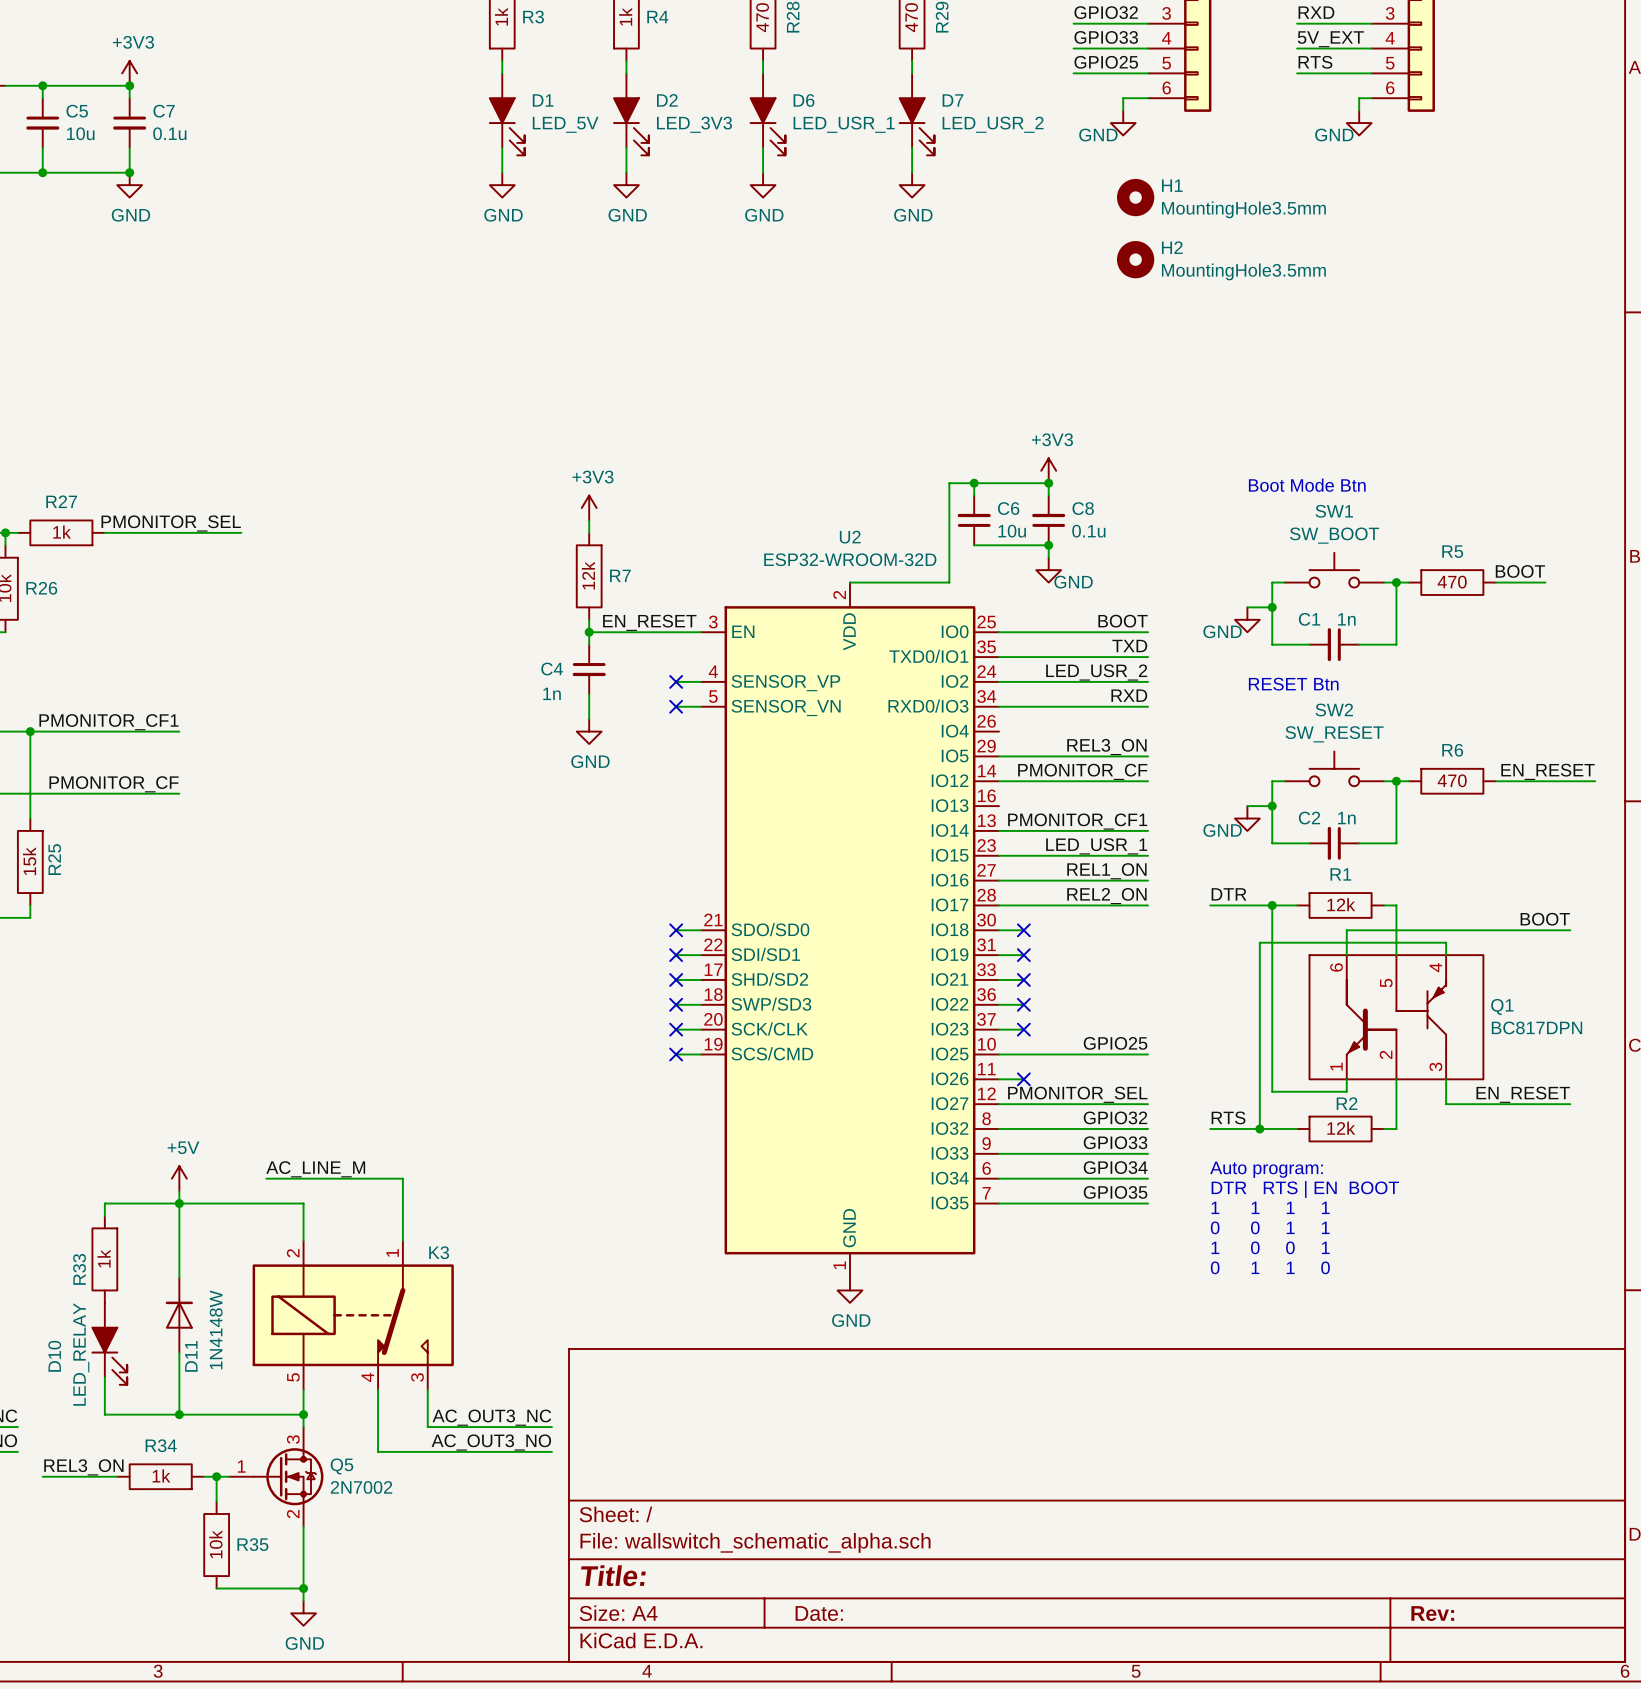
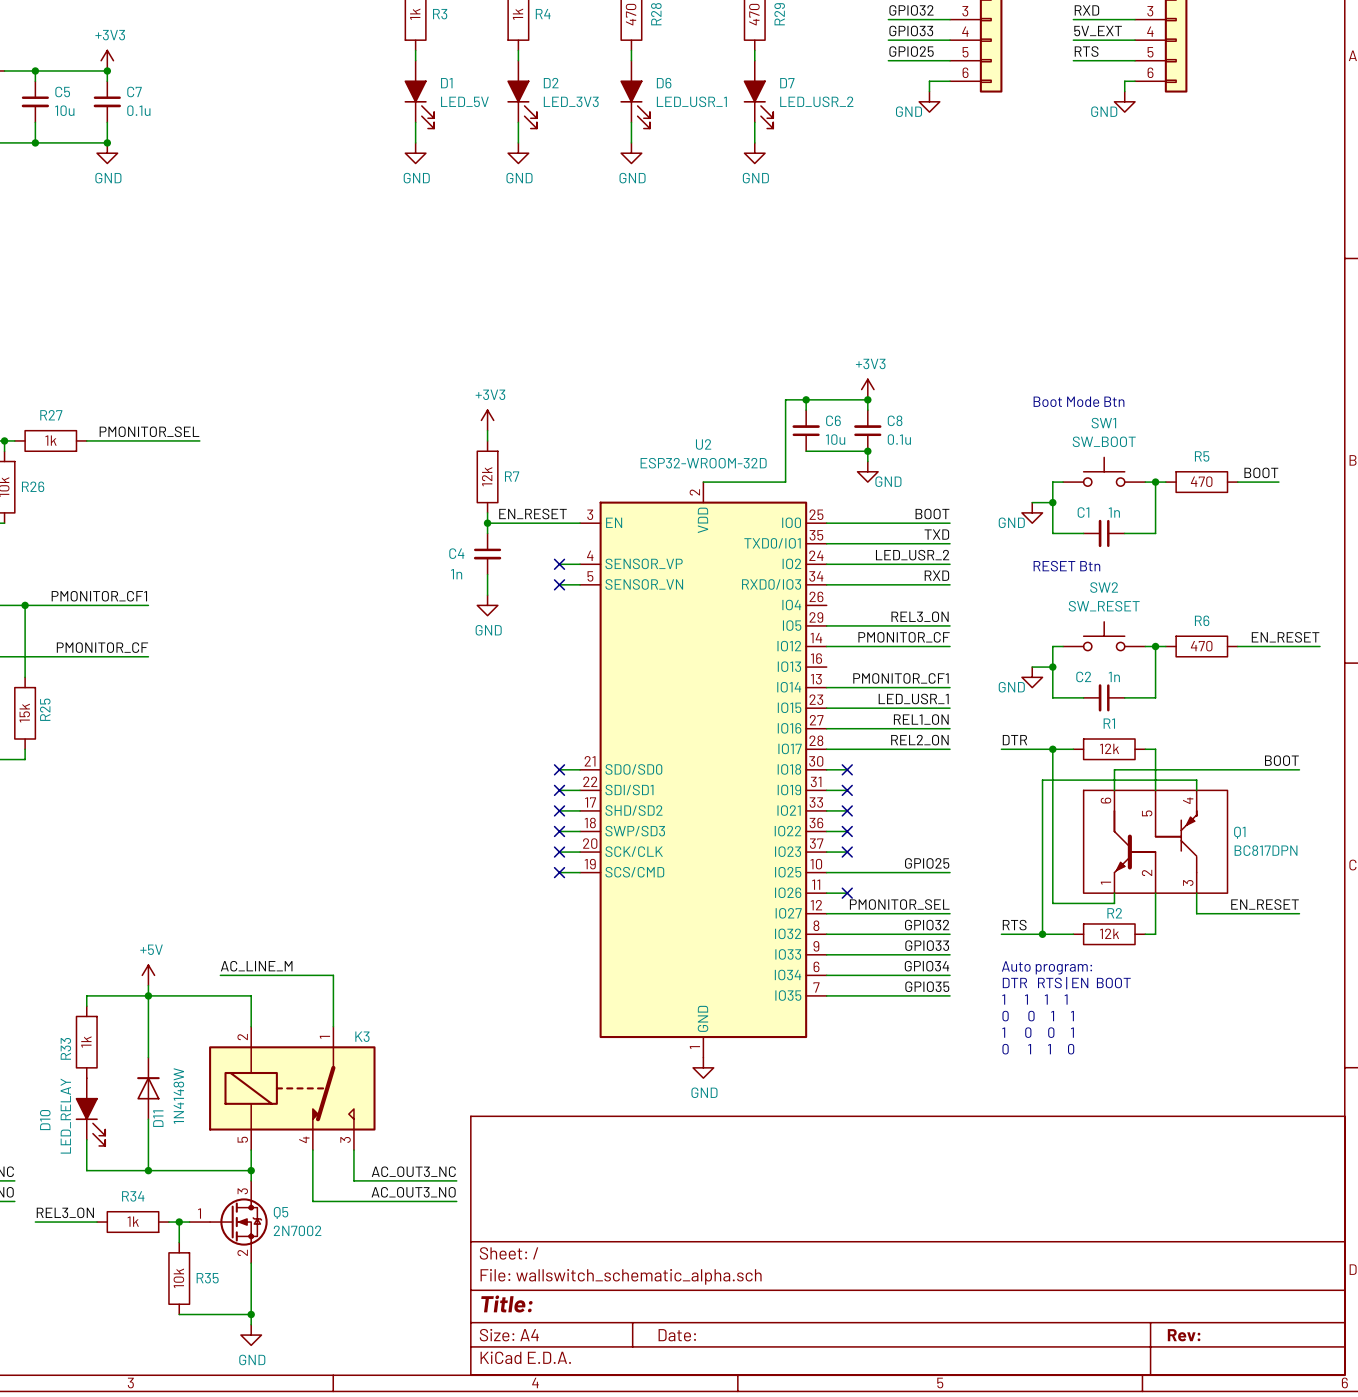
H1: MountingHole3.5mm (1135, 197) -> none
H2: MountingHole3.5mm (1135, 259) -> none

